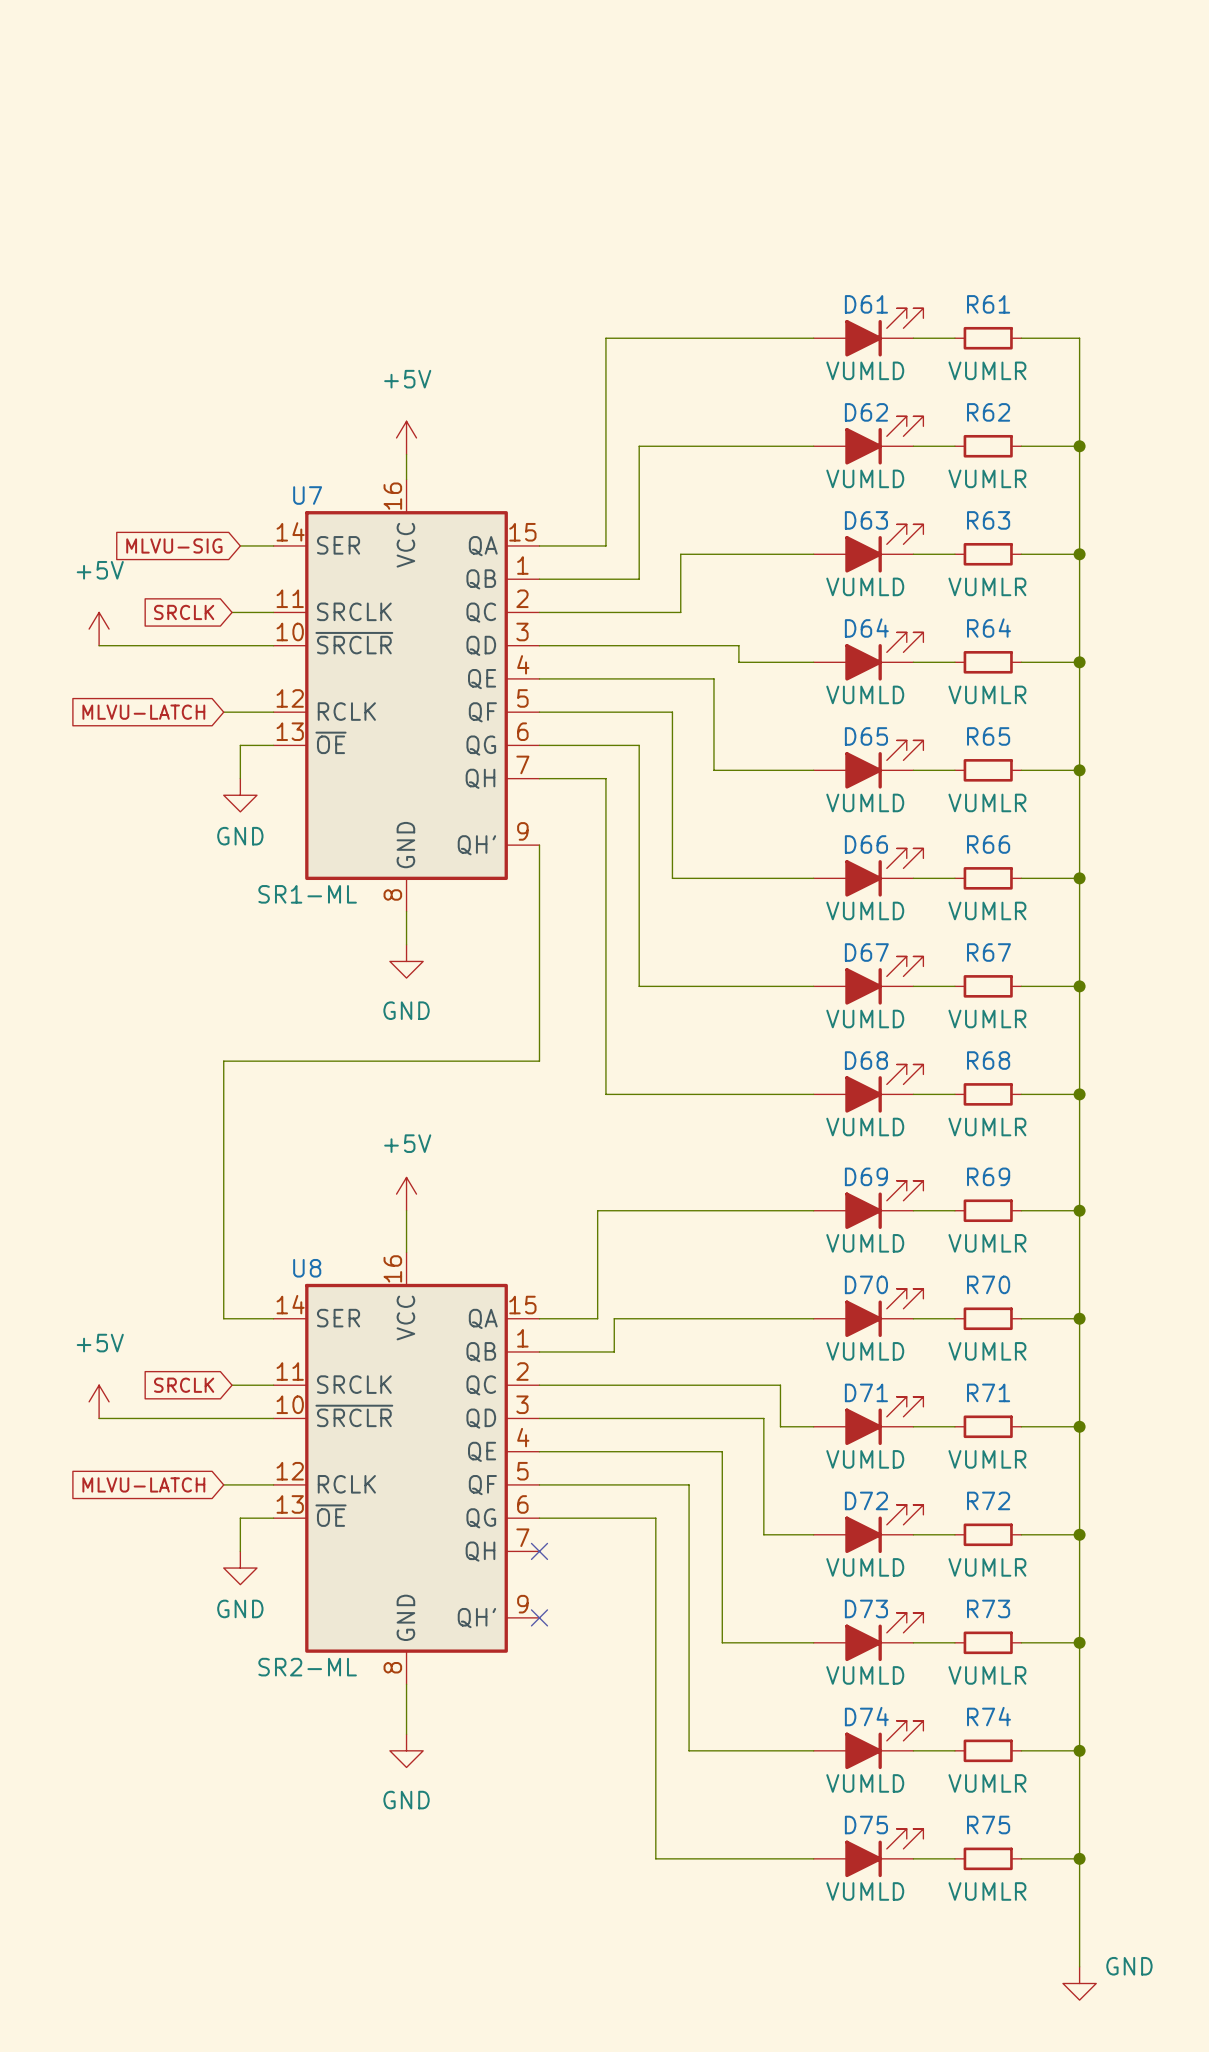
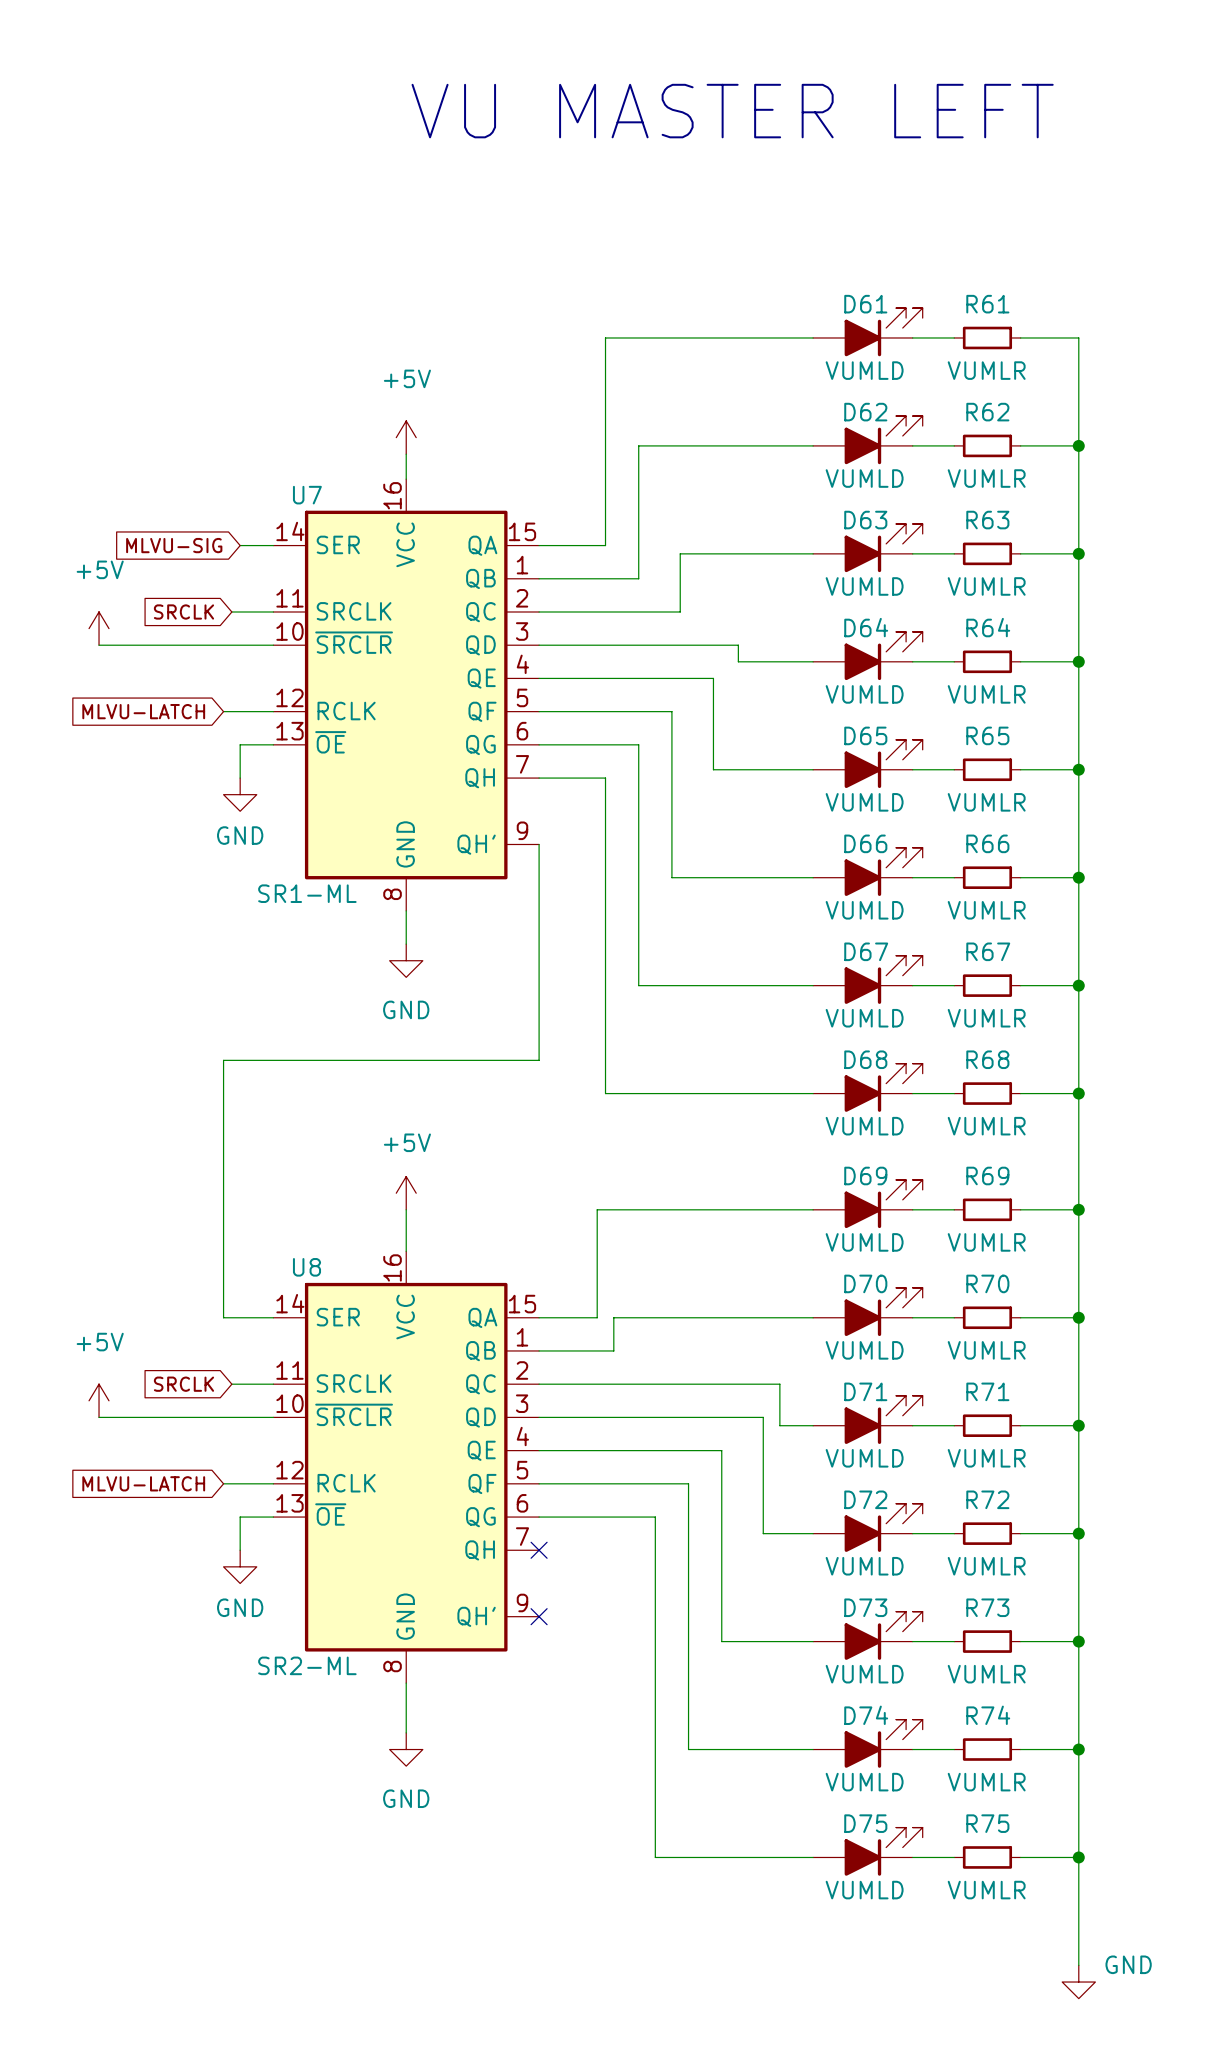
text: none -> VU MASTER LEFT (732, 111)

